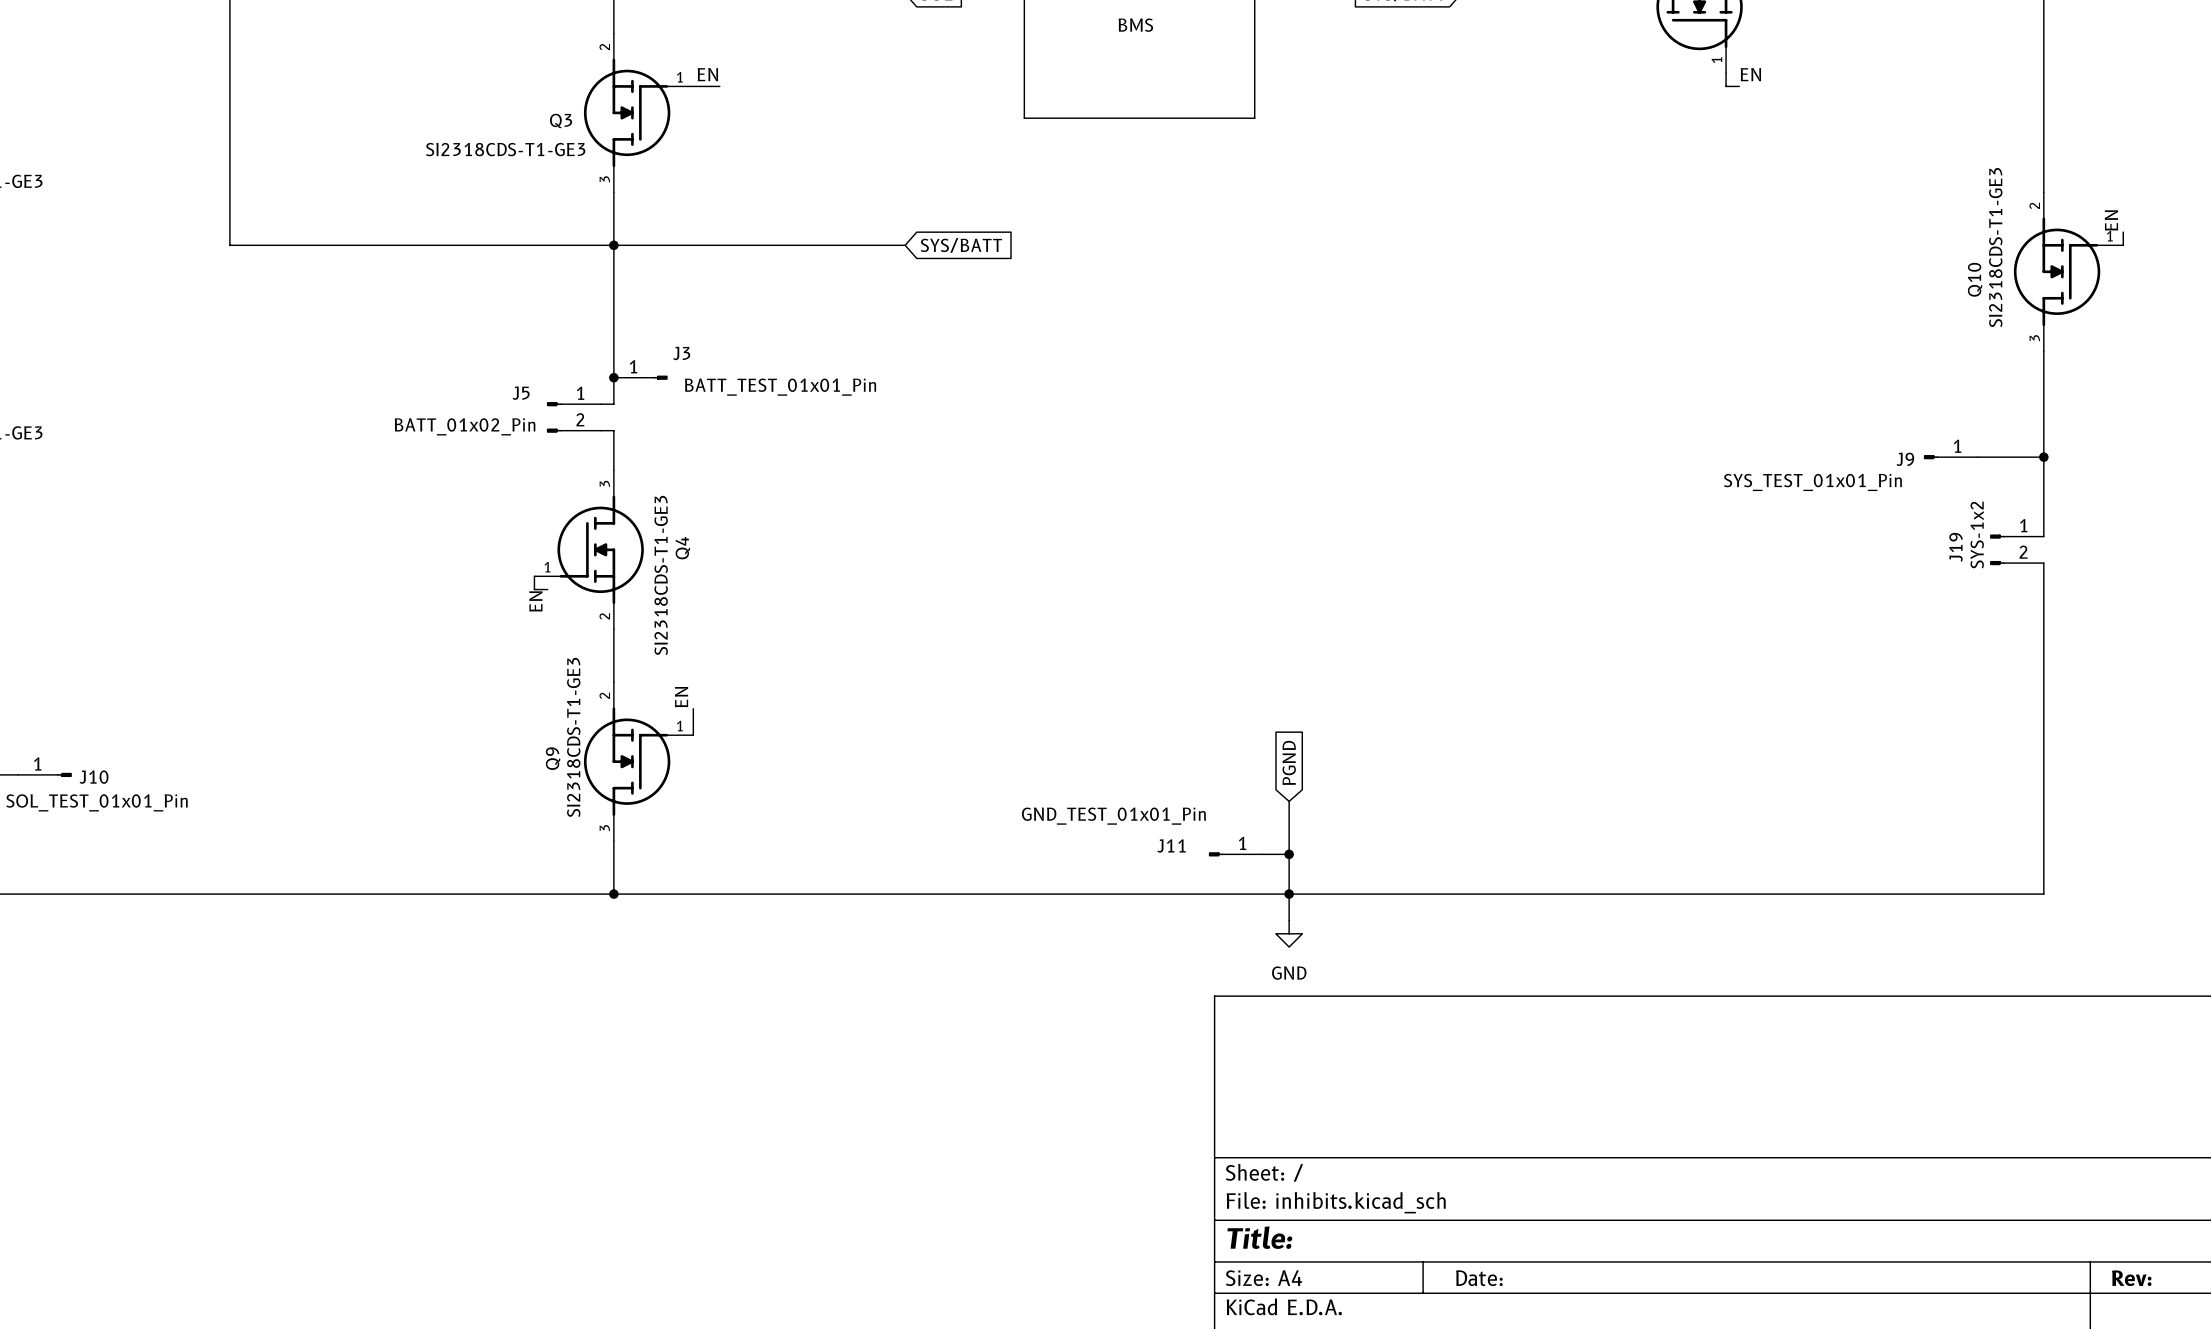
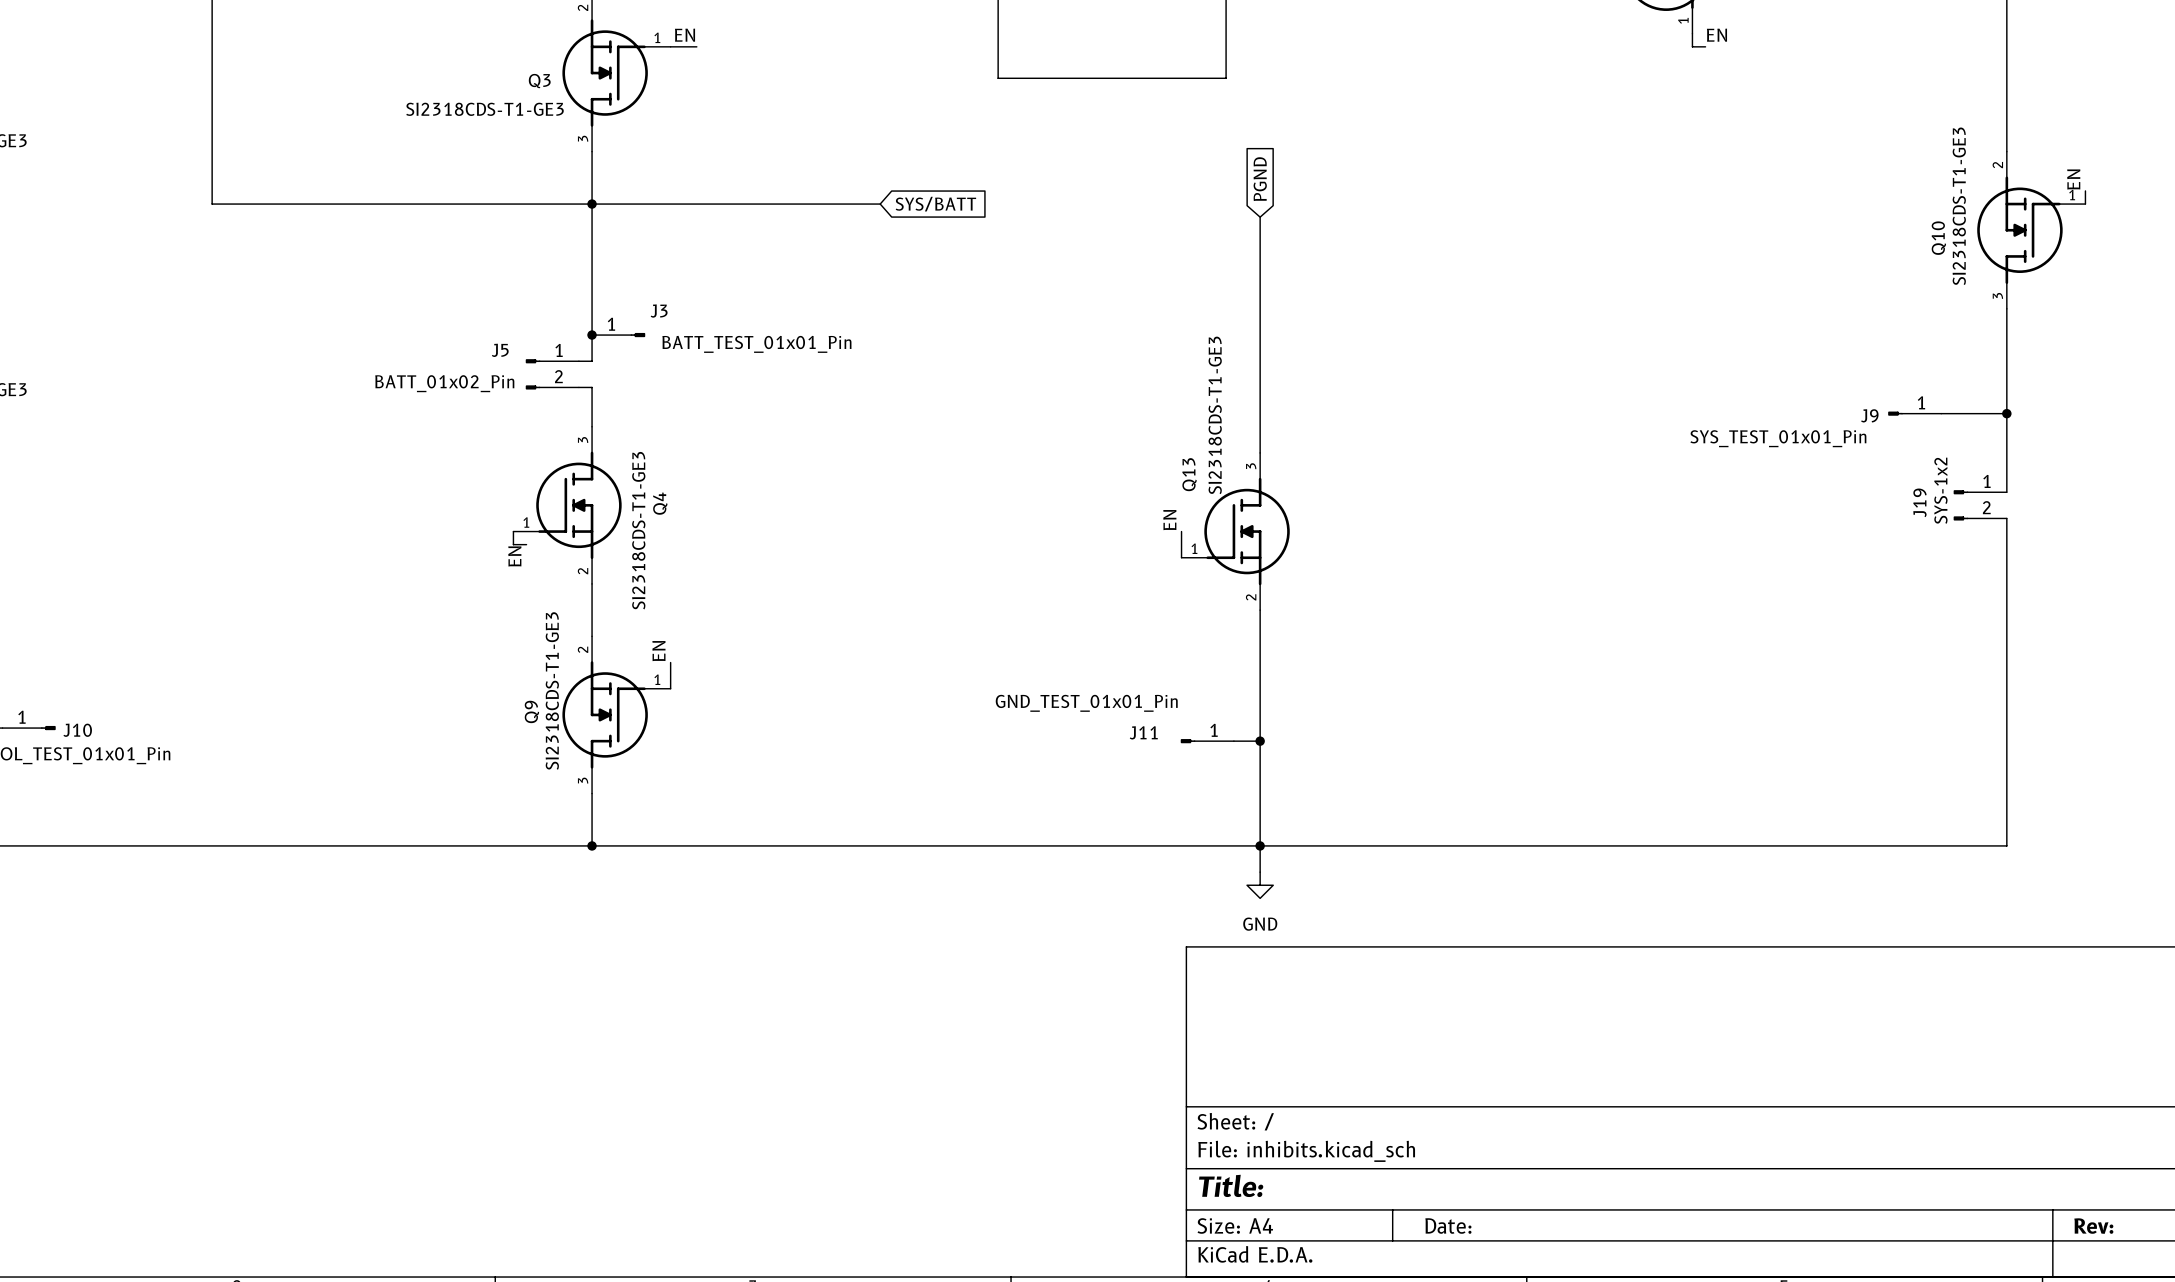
global label: none -> PGND (1260, 179)
wire: none -> (1260, 217) (1260, 452)
label: none -> EN (1169, 520)
wire: none -> (1181, 531) (1181, 557)
Q13: none -> SI2318CDS-T1-GE3 (1235, 531)
wire: none -> (1260, 610) (1260, 754)
global label: PGND (1289, 763) -> none
junction: none -> (1260, 741)
J11 position: (1235, 854) -> (1207, 741)
wire: (1262, 854) (1289, 854) -> (1233, 741) (1260, 741)
junction: (1289, 854) -> none

